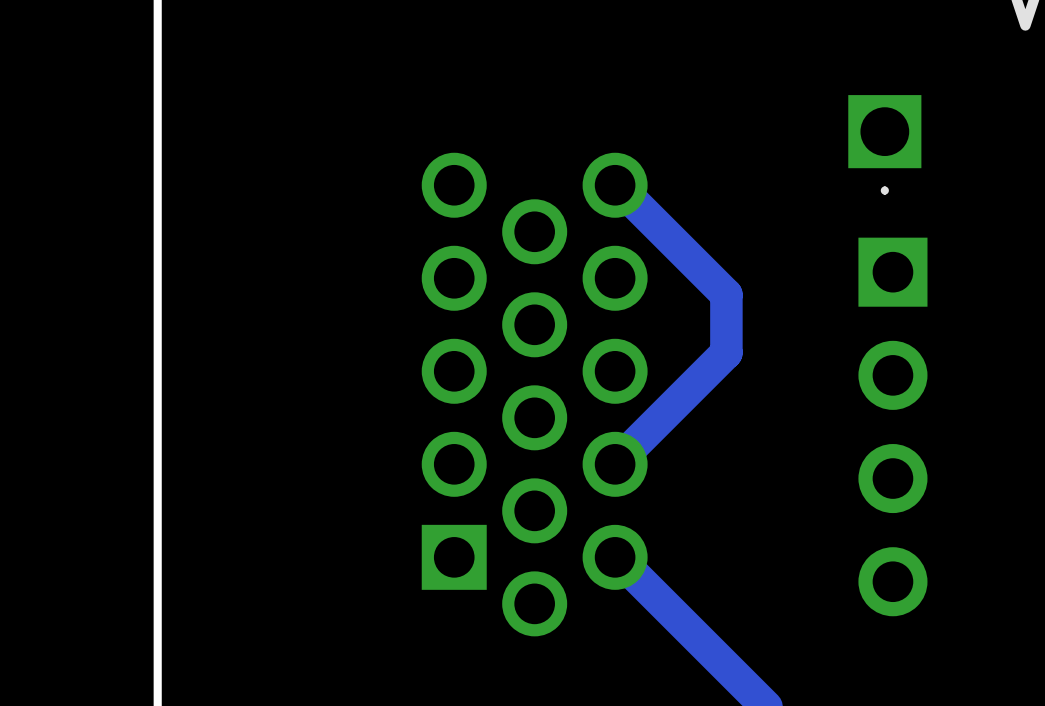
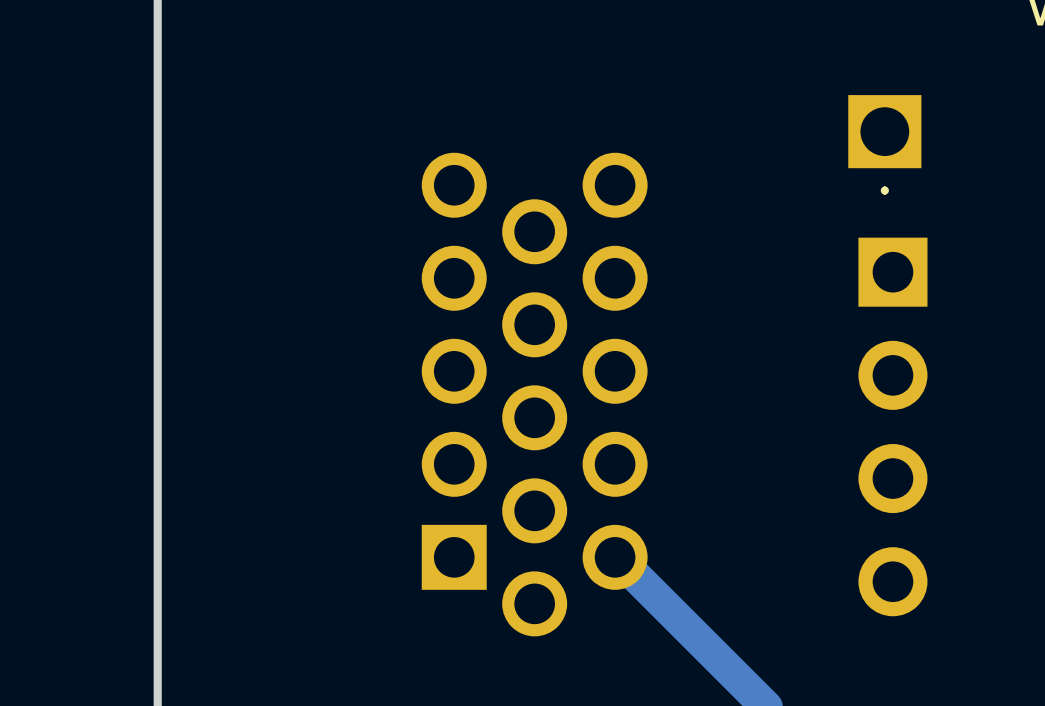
track: (615, 184) (726, 294) (726, 352) (615, 463) -> none

